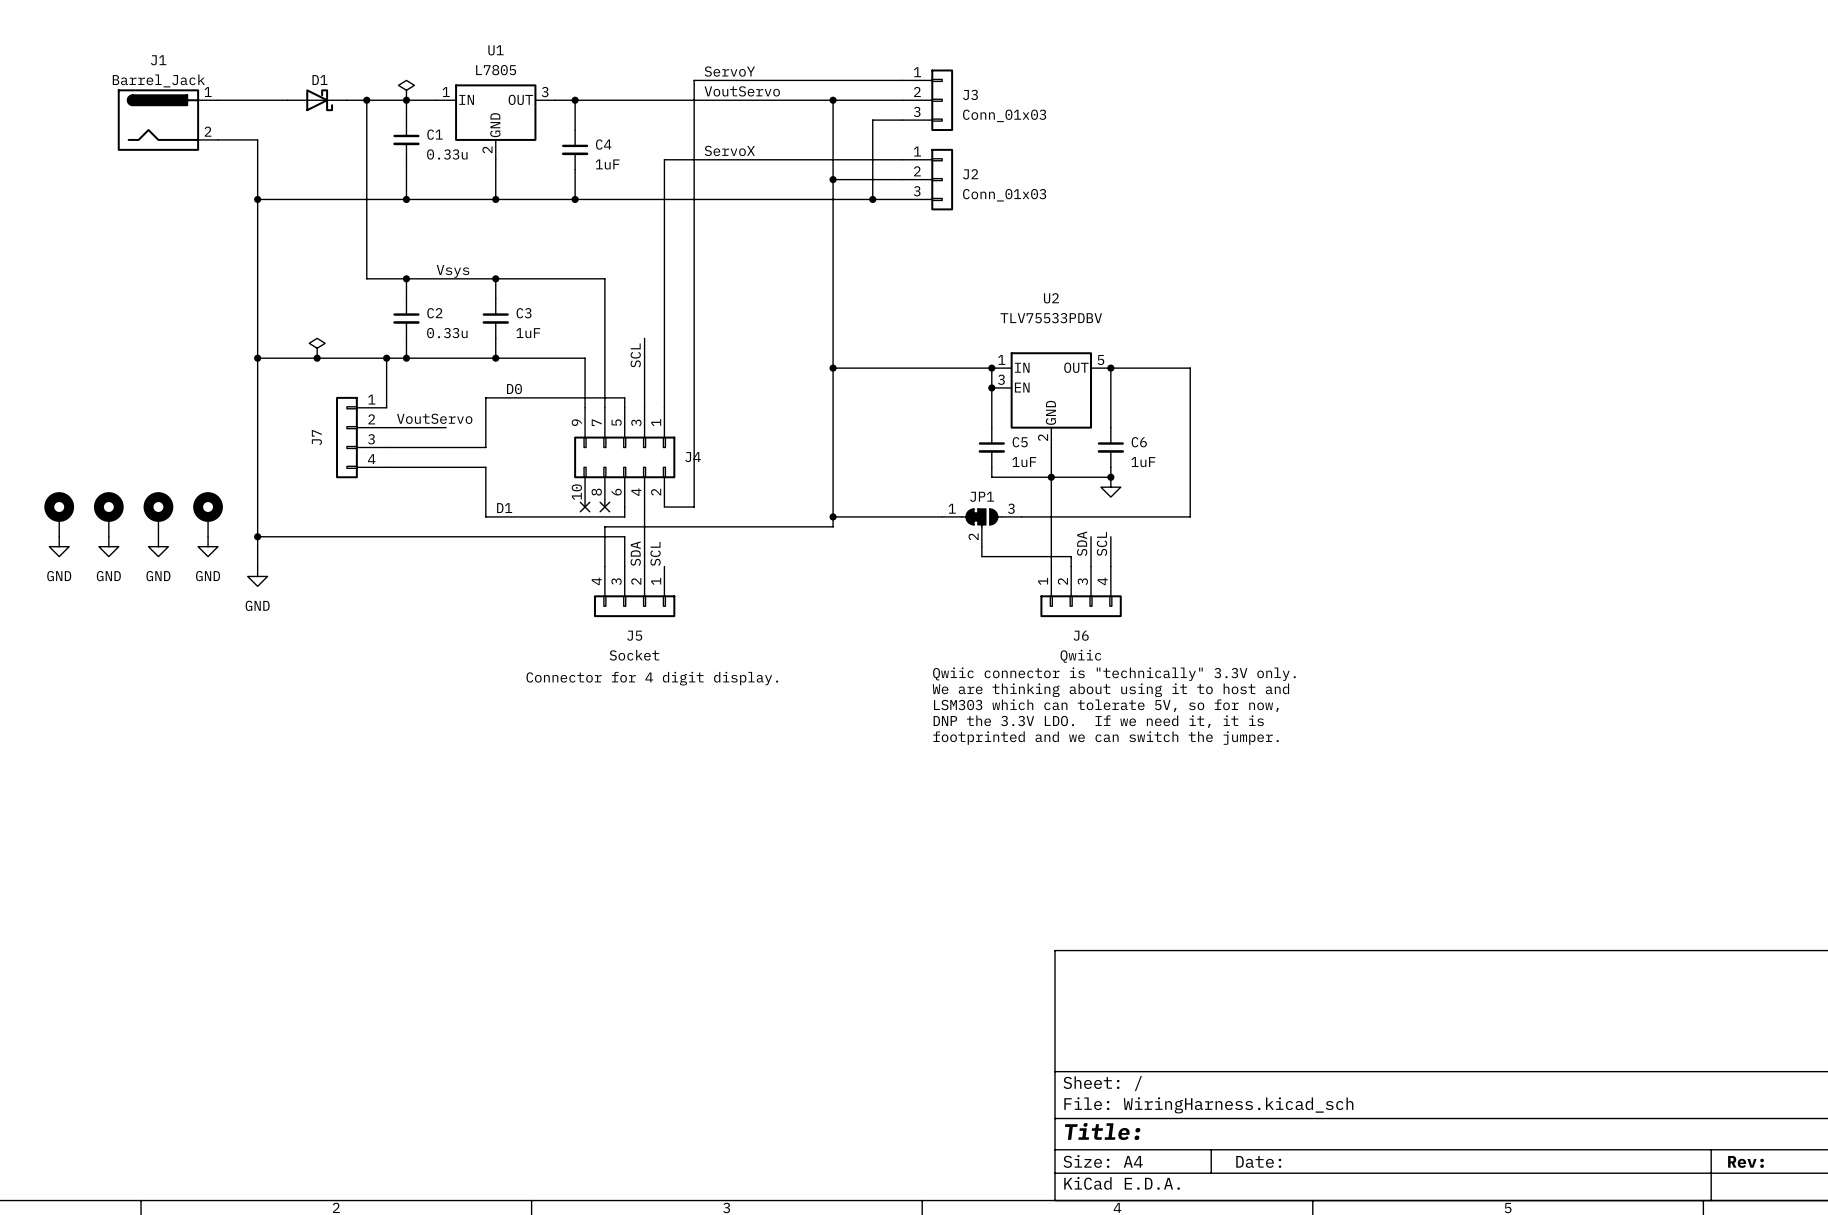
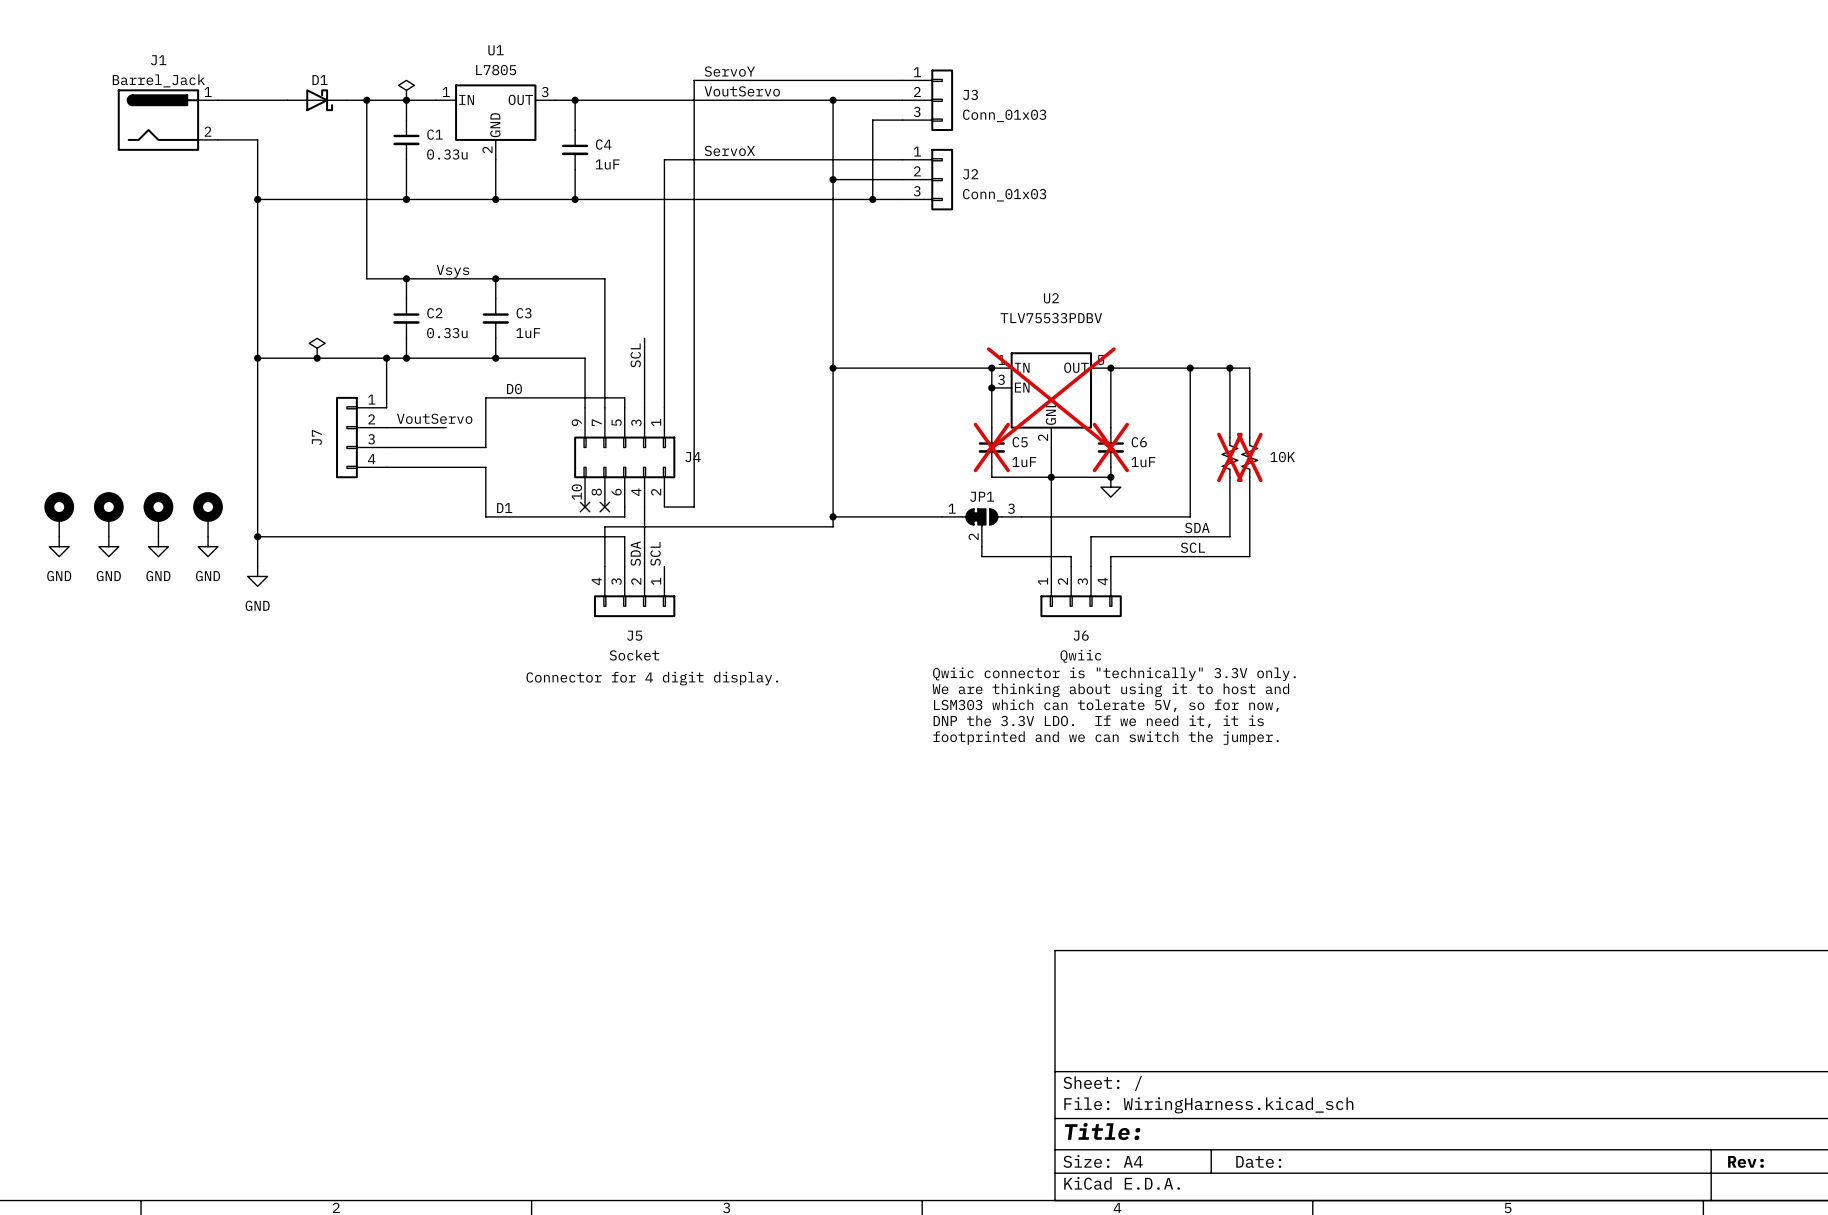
wire: none -> (1190, 368) (1249, 368) (1249, 437)
junction: none -> (1190, 368)
wire: none -> (1229, 368) (1229, 437)
junction: none -> (1229, 368)
U2 do-not-place cross: none -> (1051, 399)
C5 do-not-place cross: none -> (991, 447)
C6 do-not-place cross: none -> (1110, 447)
part: none -> (1229, 457)
part: none -> 10K (1249, 457)
wire: none -> (1229, 477) (1229, 536) (1091, 536)
wire: (1110, 536) (1110, 556) -> (1249, 477) (1249, 556) (1110, 556)
label rotation: 0° (1082, 543) -> 90° clockwise (1197, 527)
label position: SDA (1082, 543) -> SDA (1197, 527)
label rotation: 0° (1102, 543) -> 90° clockwise (1192, 547)
label position: SCL (1102, 543) -> SCL (1192, 547)

